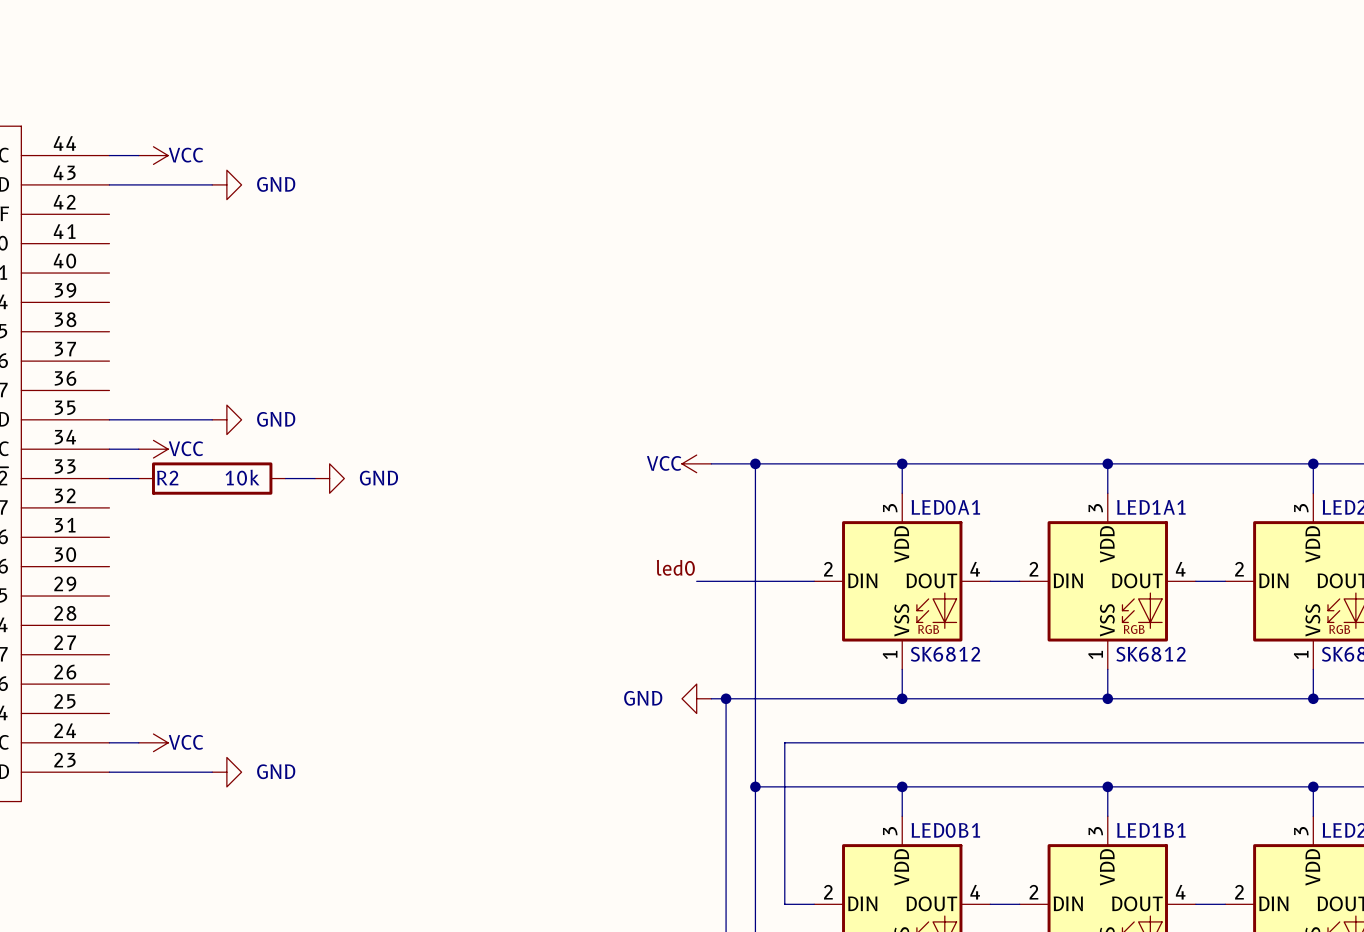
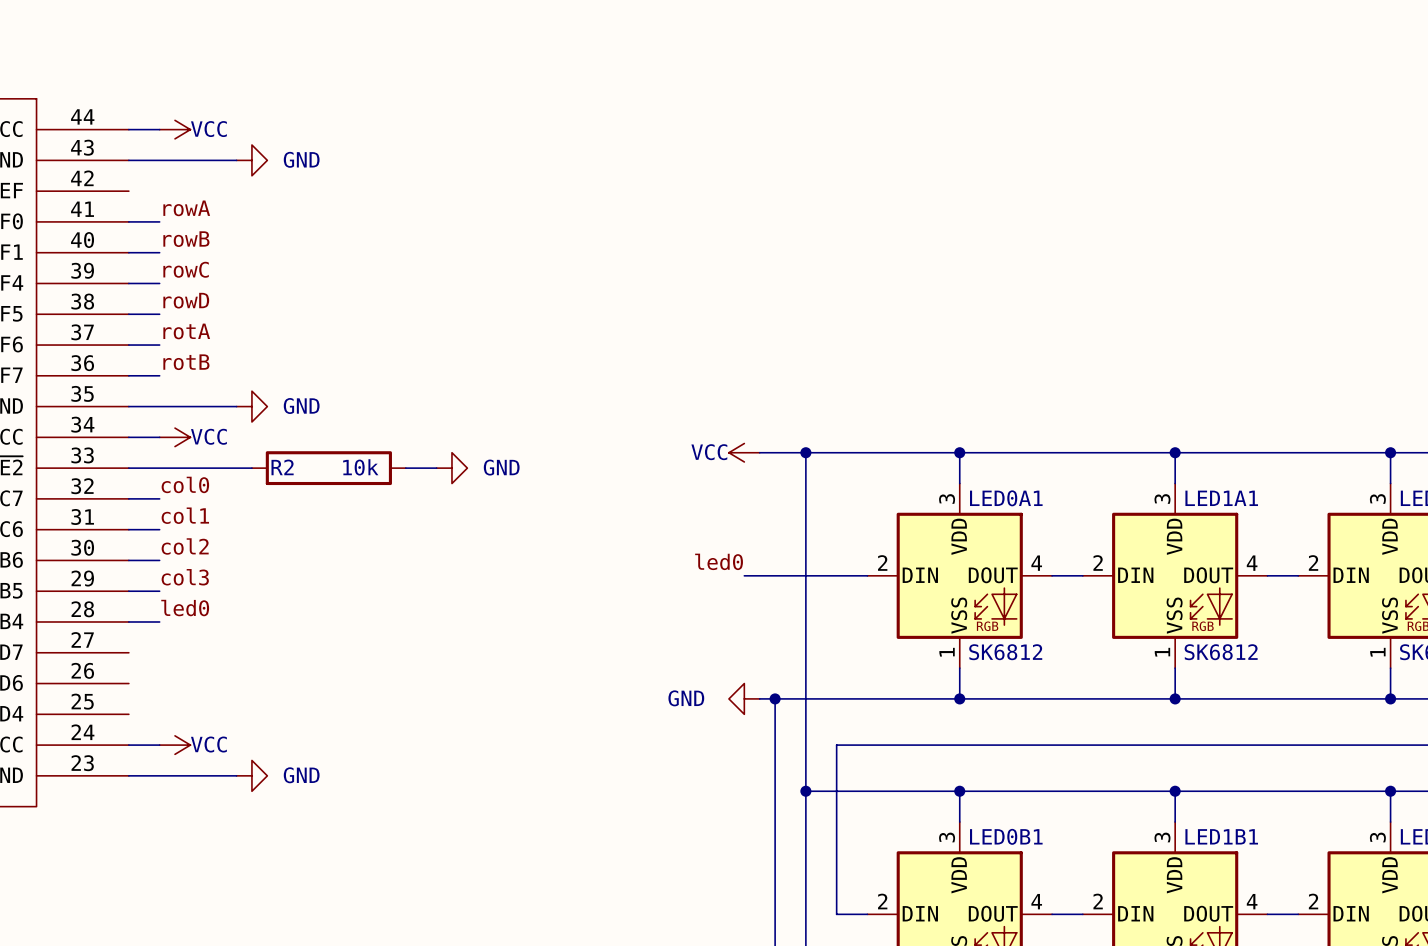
label: none -> rowA (186, 208)
wire: none -> (128, 221) (159, 221)
label: none -> rowB (186, 239)
wire: none -> (128, 252) (159, 252)
label: none -> rowC (186, 269)
wire: none -> (128, 283) (159, 283)
label: none -> rowD (186, 300)
wire: none -> (128, 314) (159, 314)
label: none -> rotA (186, 331)
wire: none -> (128, 345) (159, 345)
label: none -> rotB (186, 362)
wire: none -> (128, 375) (159, 375)
wire: none -> (159, 468) (251, 468)
R2 position: (212, 478) -> (328, 468)
wire: (285, 478) (314, 478) -> (405, 468) (436, 468)
power symbol position: GND (329, 478) -> GND (451, 468)
label: none -> col0 (185, 484)
wire: none -> (128, 498) (159, 498)
label: none -> col1 (185, 515)
wire: none -> (128, 529) (159, 529)
label: none -> col2 (185, 546)
wire: none -> (128, 560) (159, 560)
label: none -> col3 (185, 577)
wire: none -> (128, 591) (159, 591)
label: none -> led0 (185, 608)
wire: none -> (128, 621) (159, 621)

